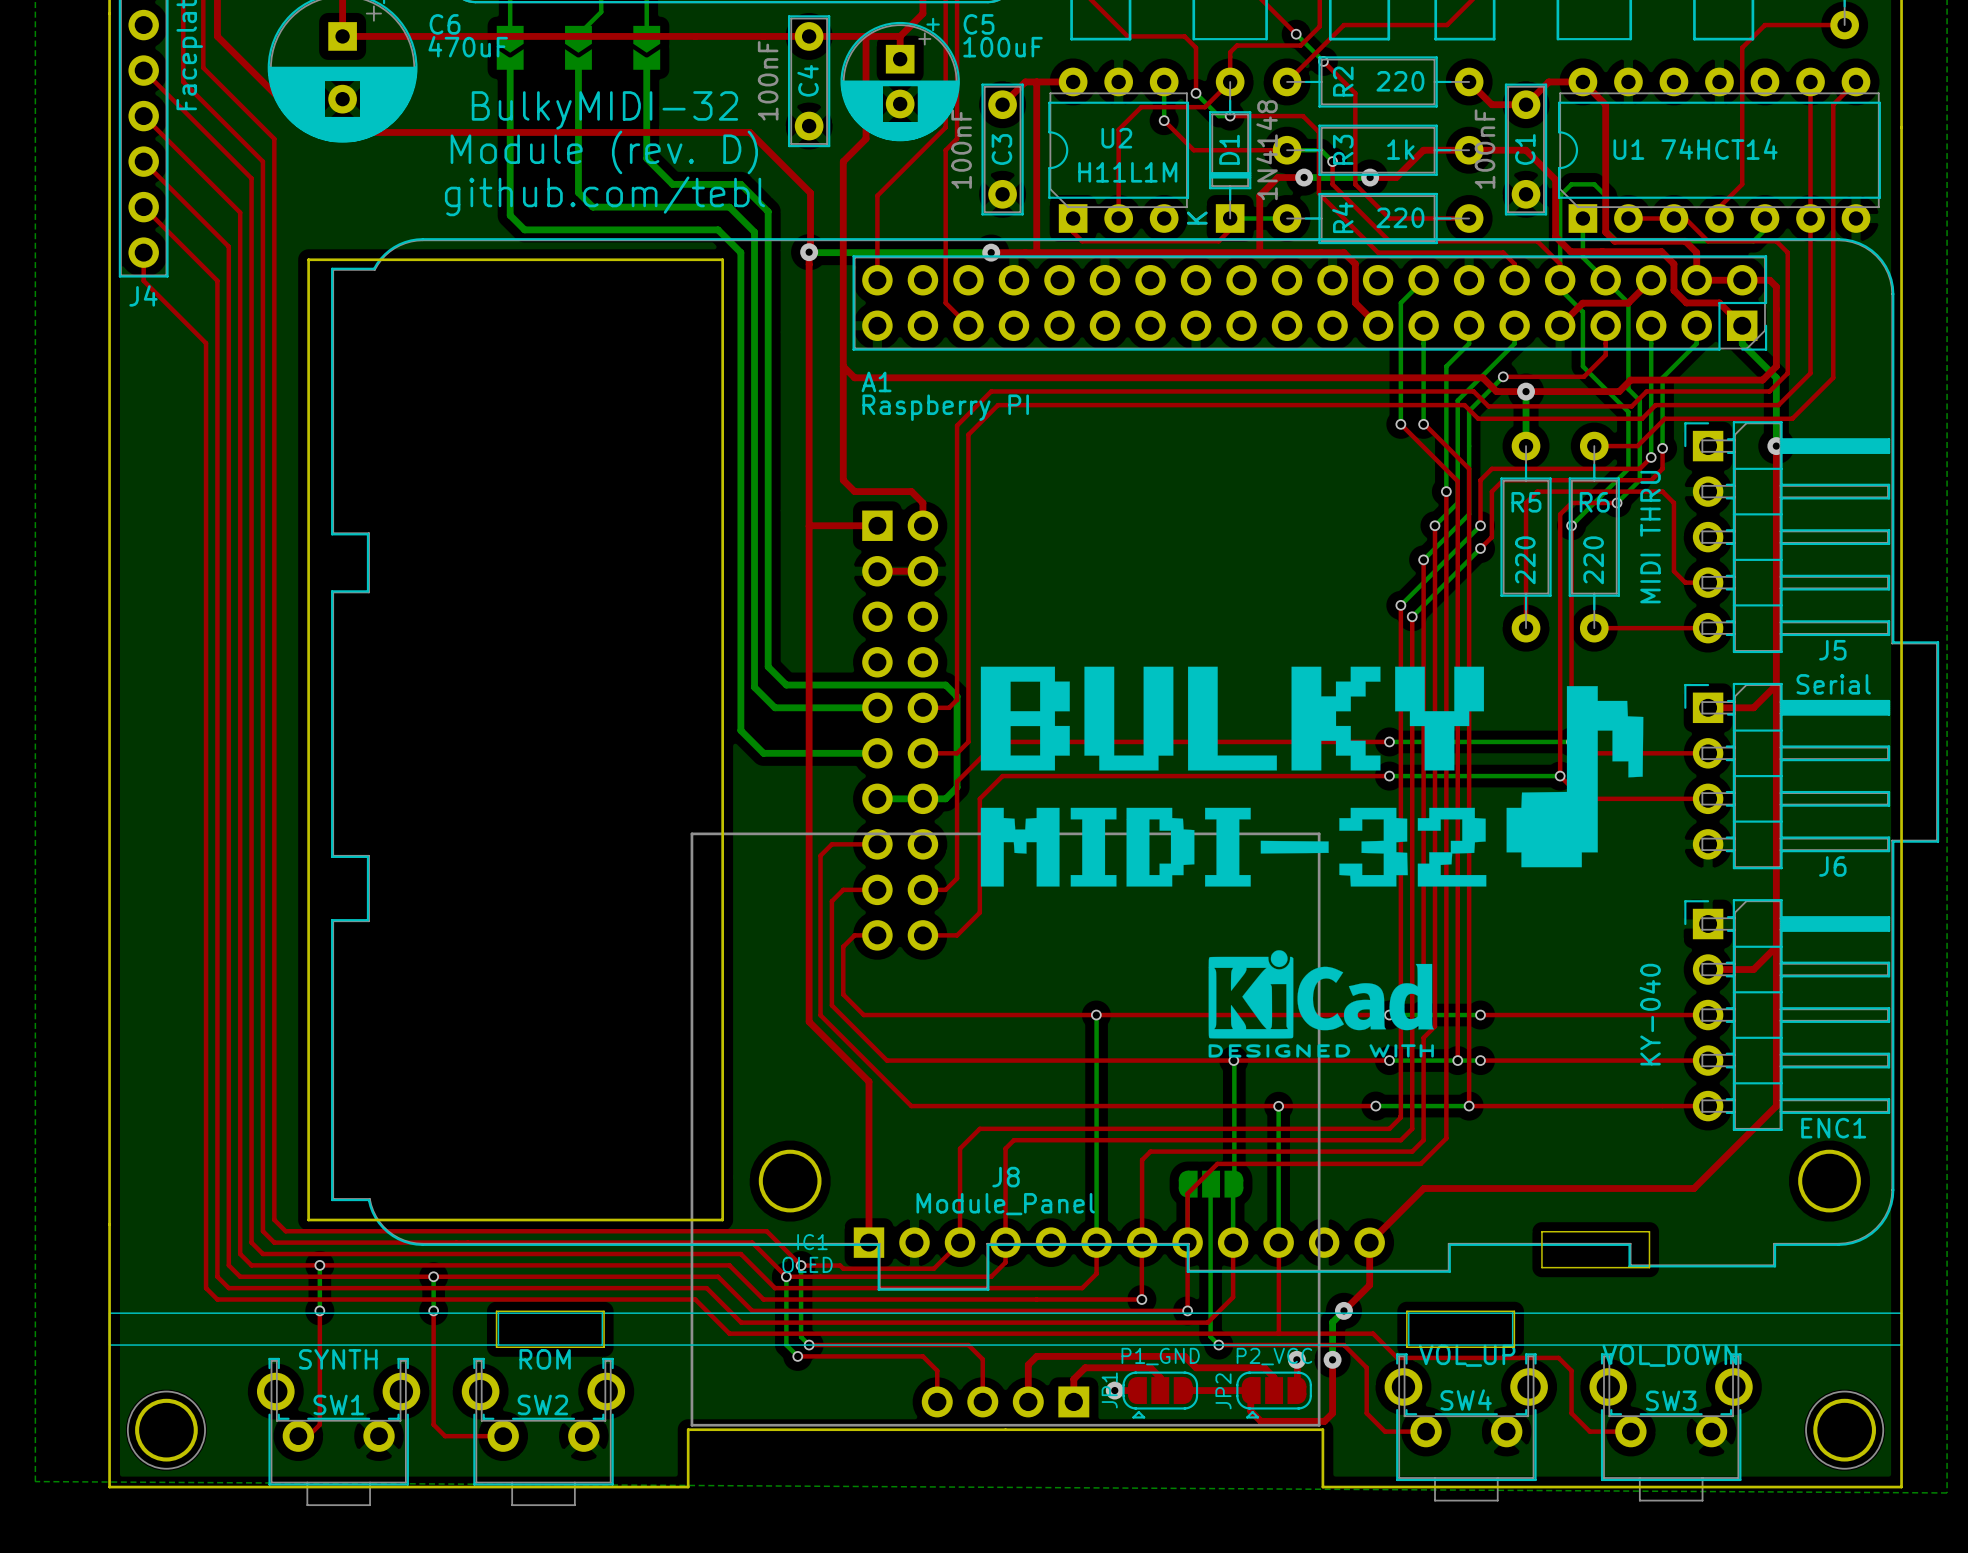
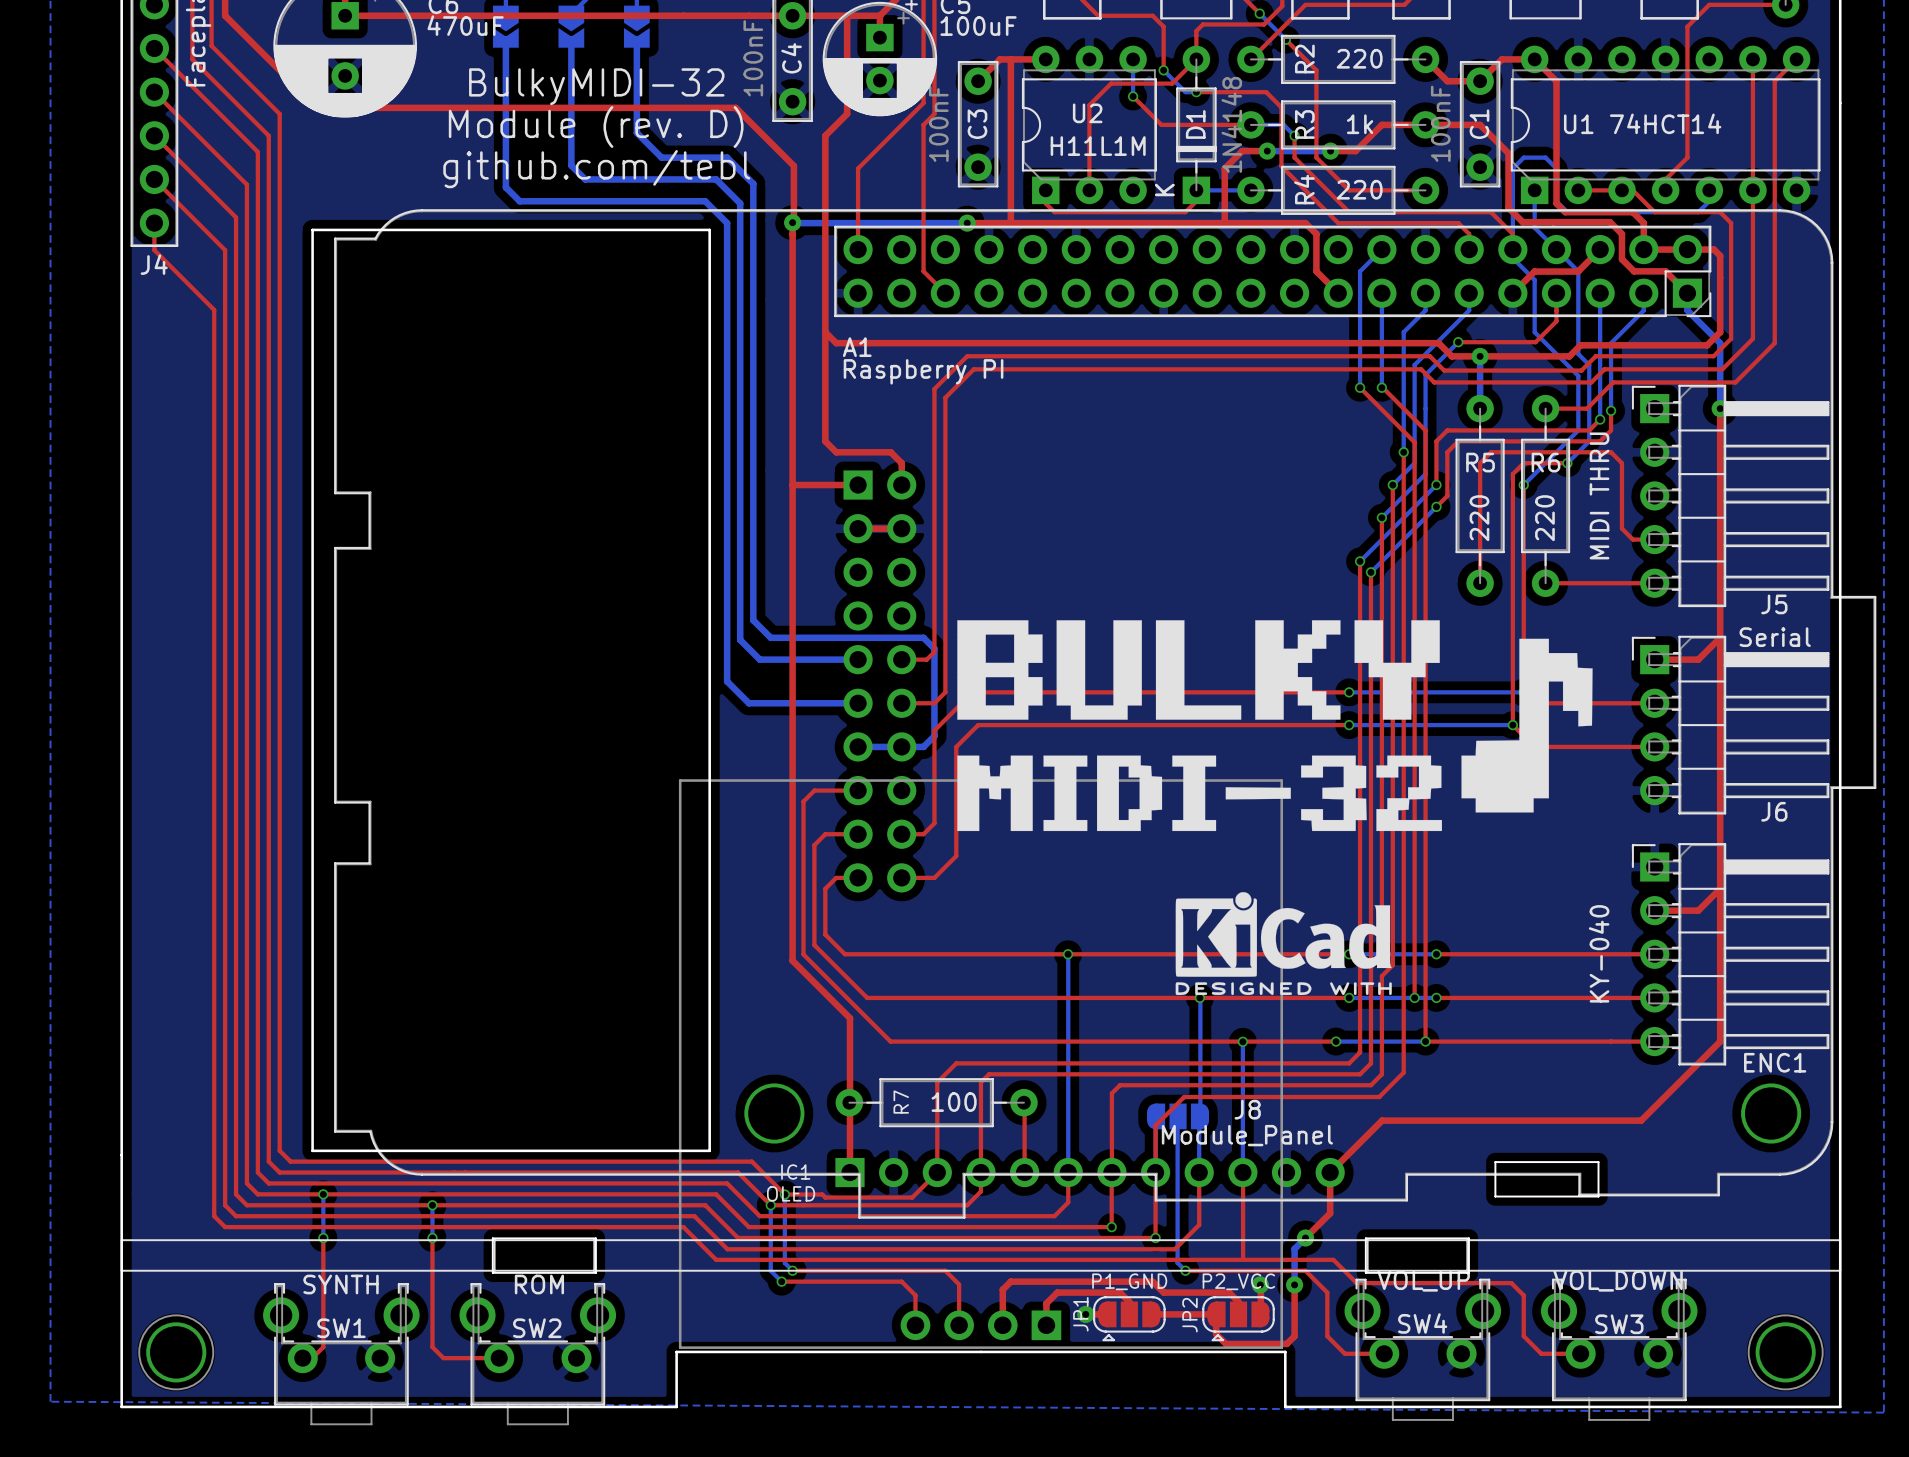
R7: none -> 100 (936, 1102)
top track: none -> (1023, 1102) (1024, 1172)
J8 name position: J8 (1006, 1177) -> J8 (1247, 1109)
J8 value position: Module_Panel (1005, 1204) -> Module_Panel (1247, 1135)

